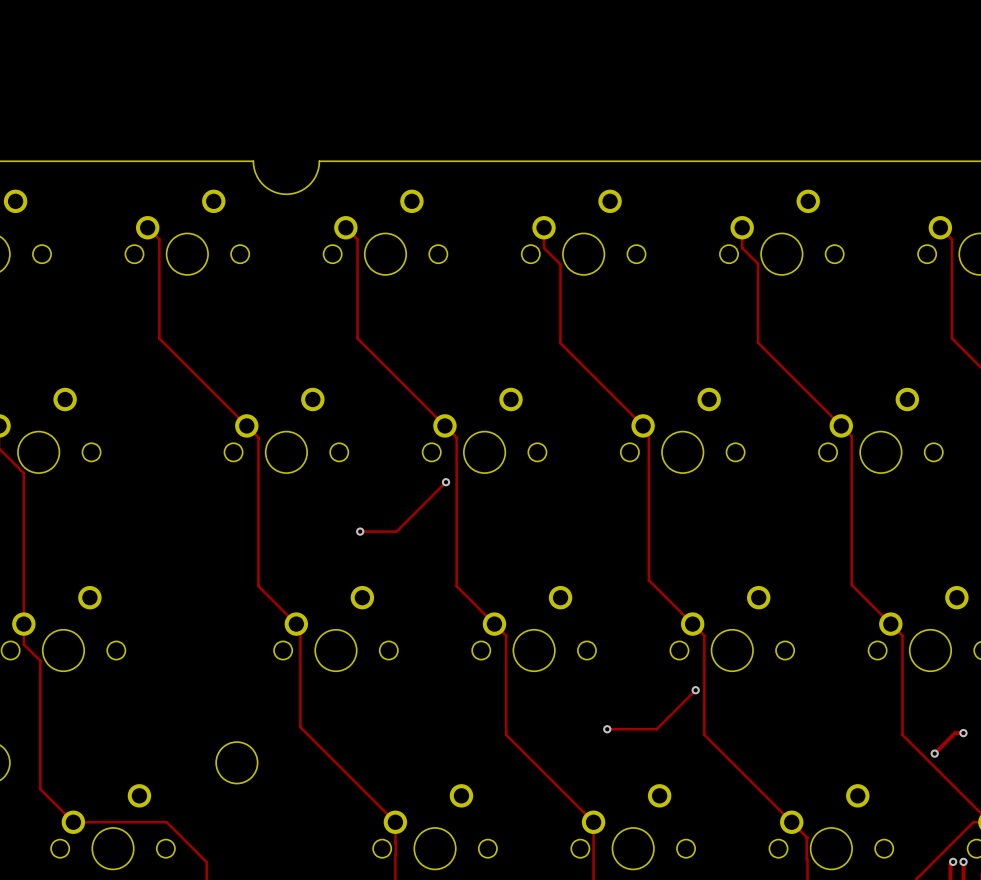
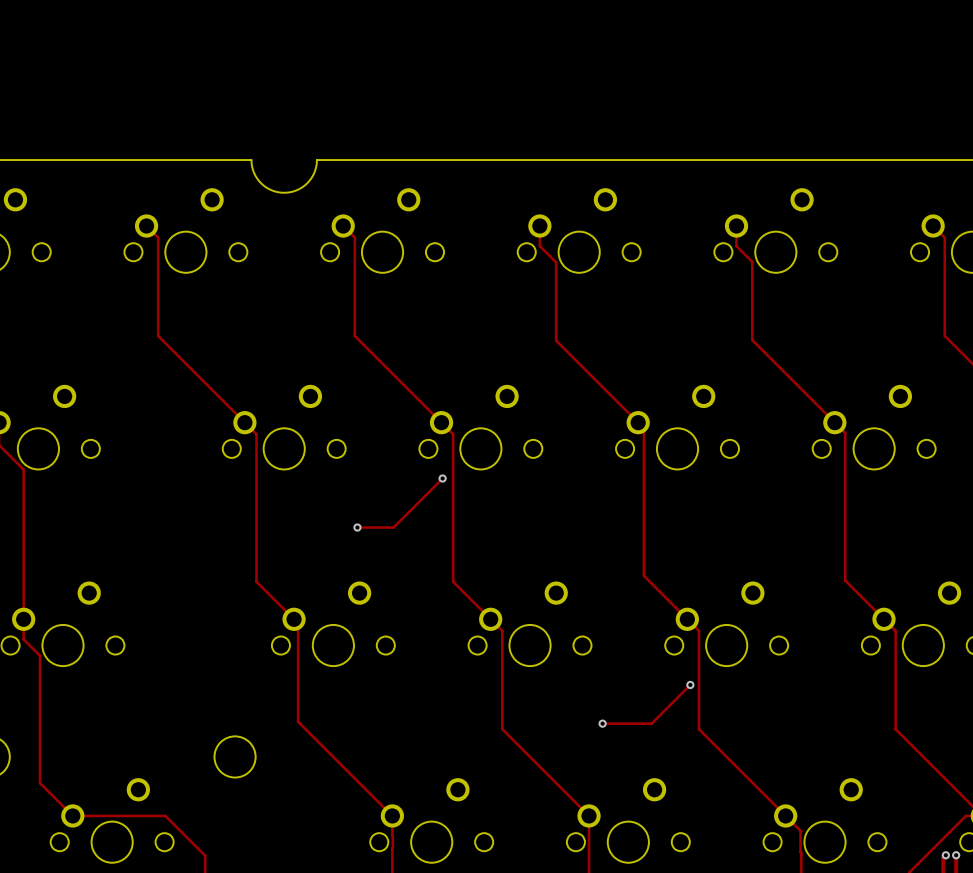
track: (963, 733) (955, 733) (934, 753) -> none
via: (963, 733) -> none
via: (934, 753) -> none

